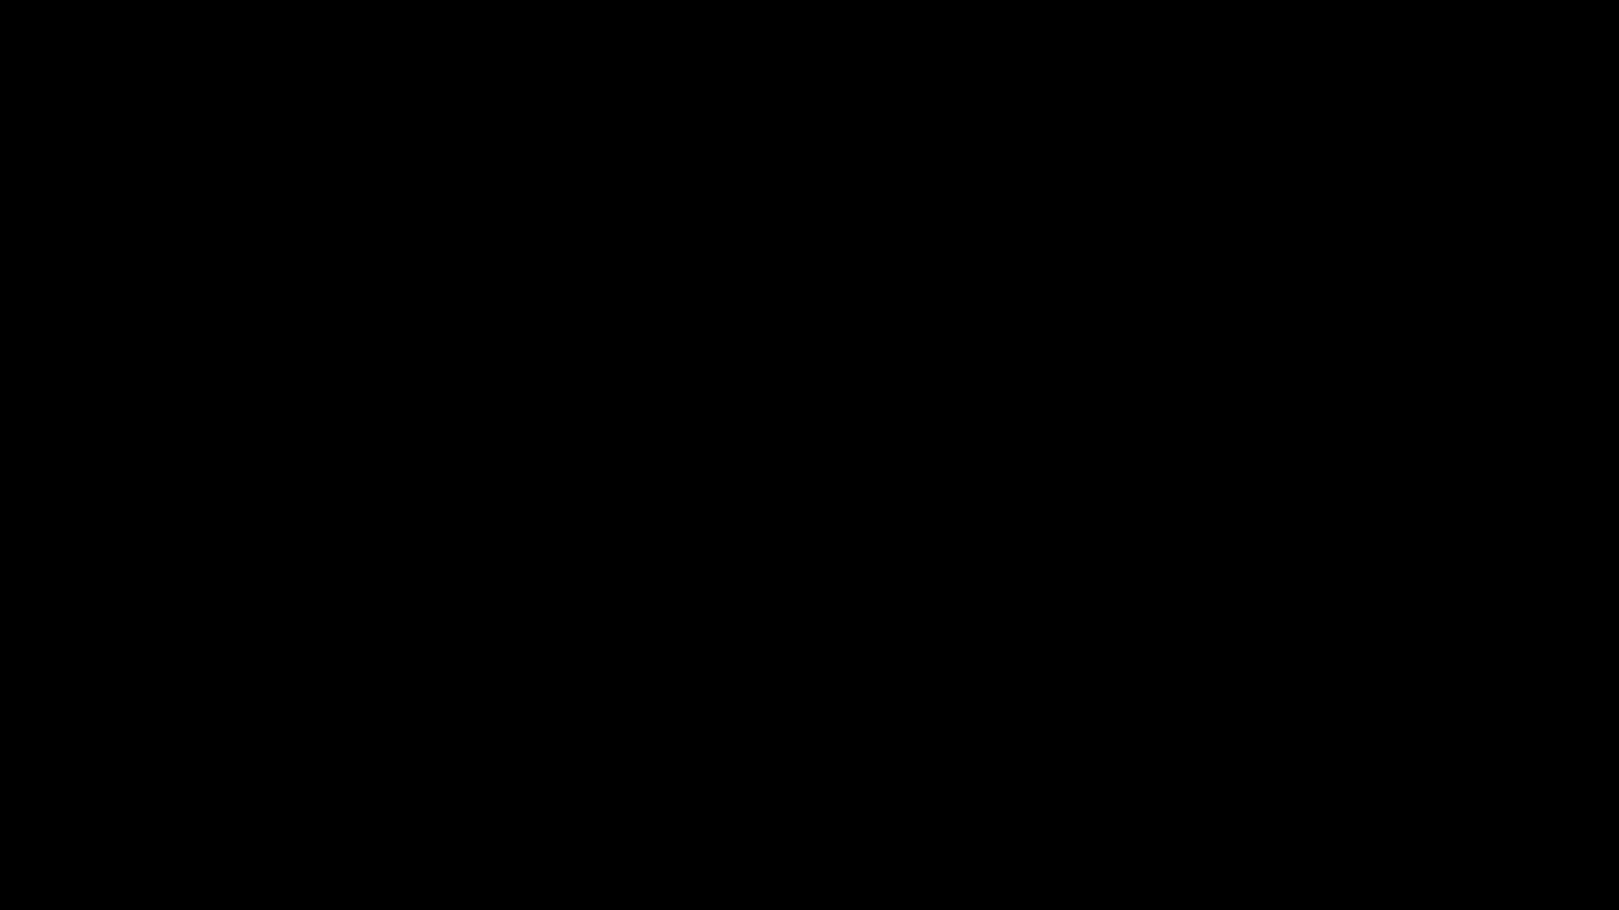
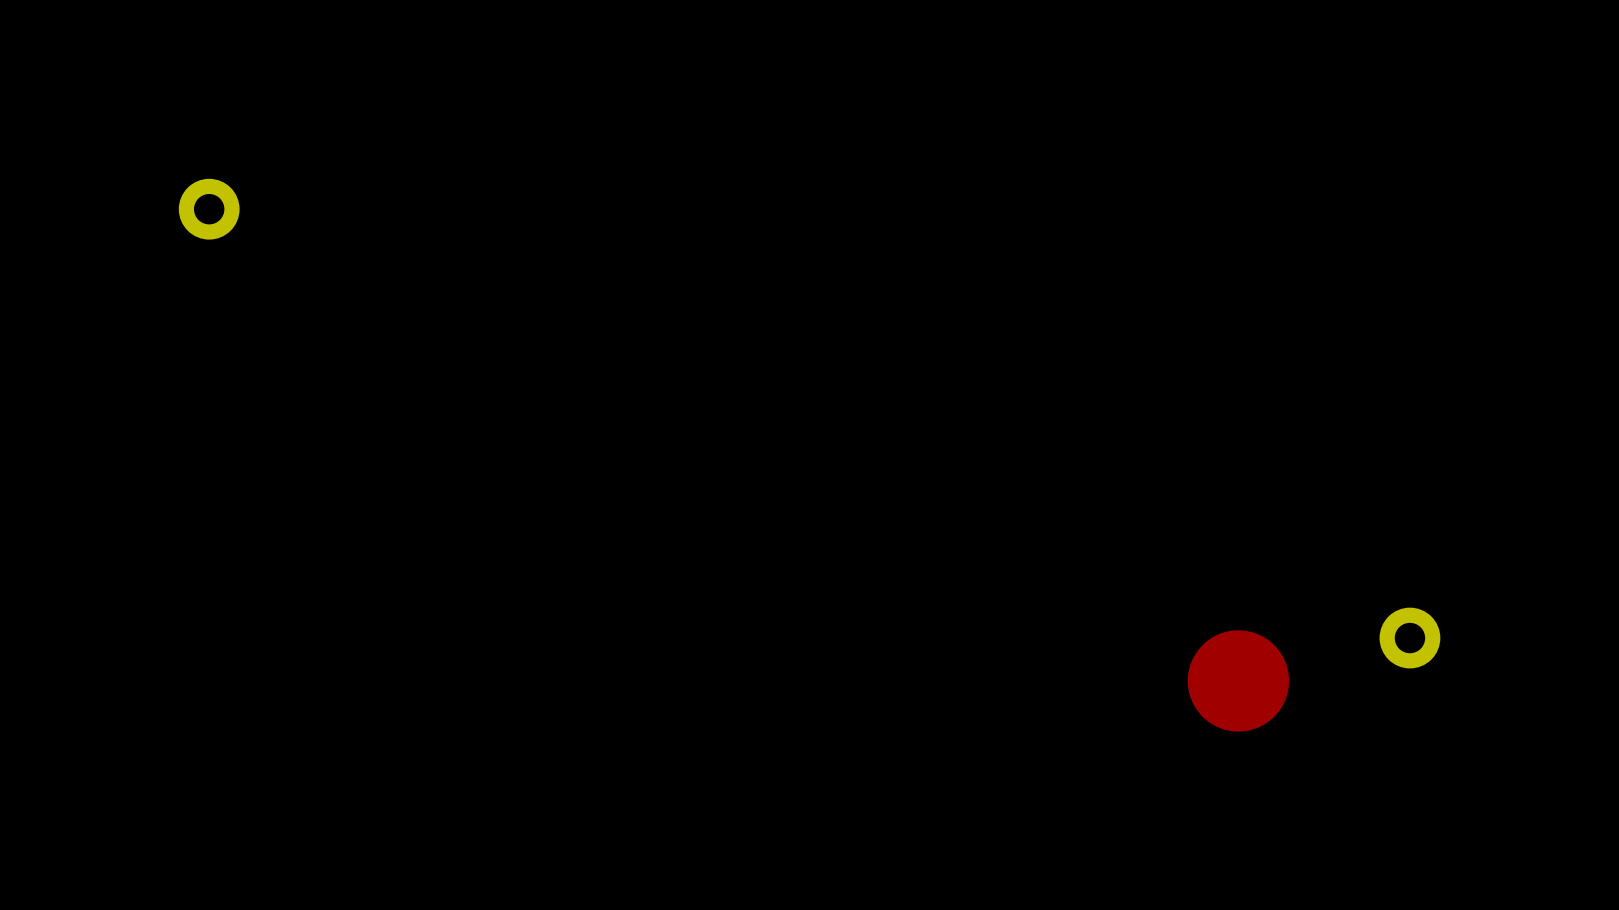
part: none -> (209, 209)
part: none -> (1409, 638)
part: none -> (1238, 680)

